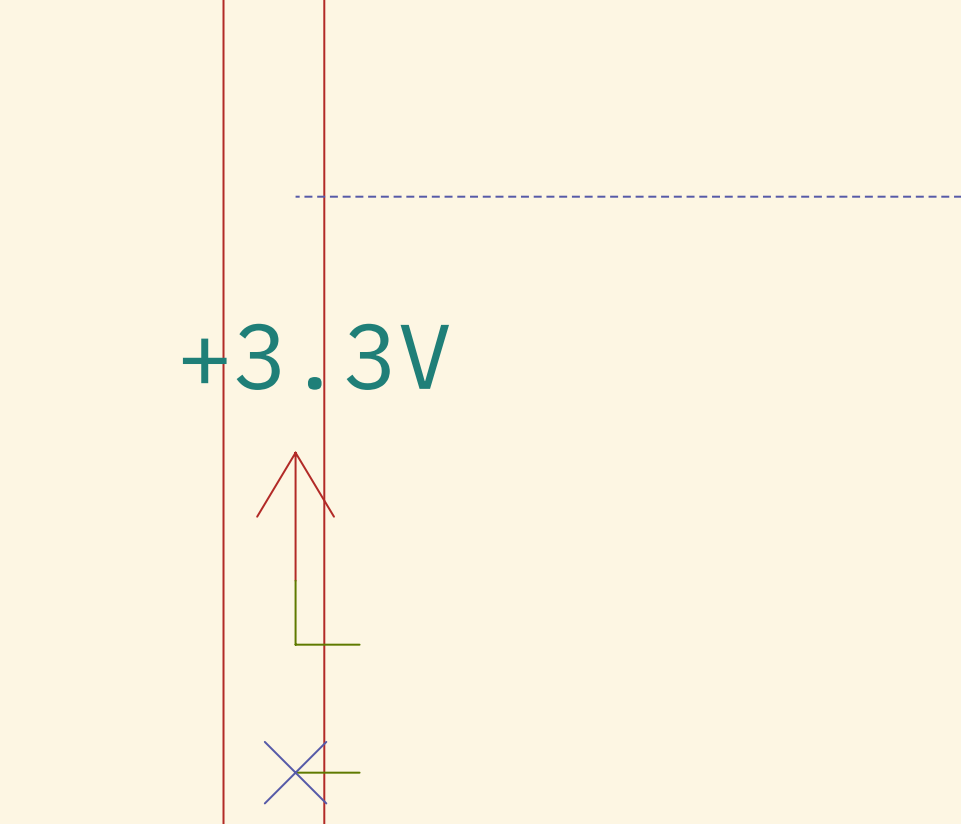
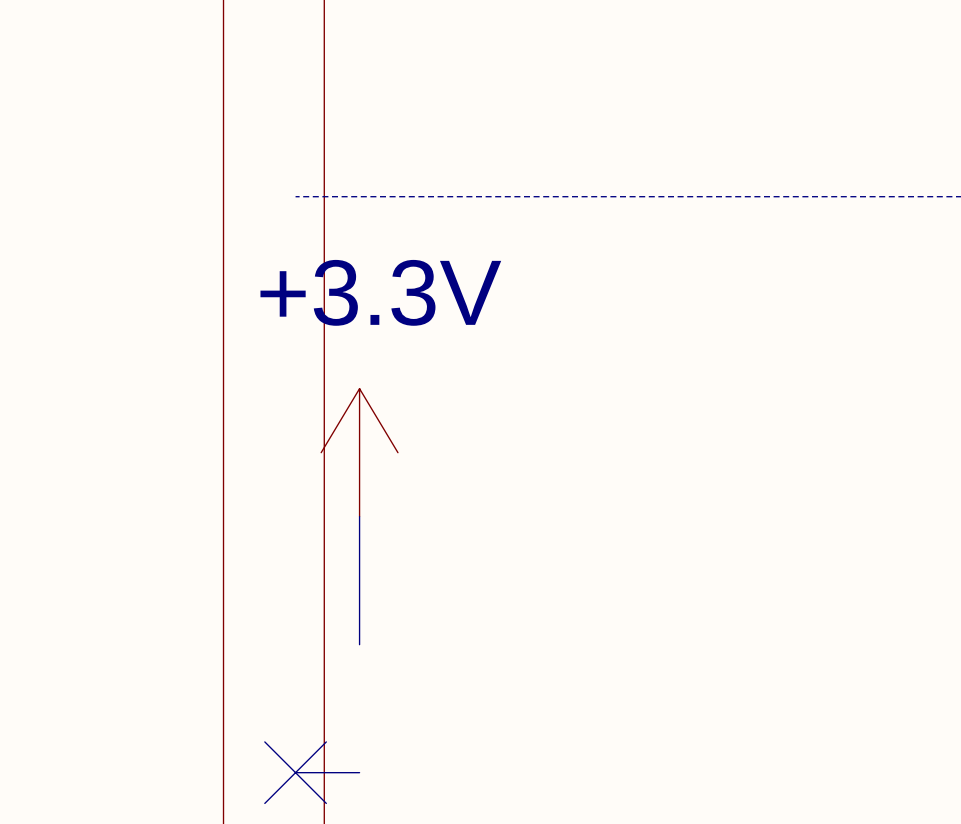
power symbol position: +3.3V (295, 516) -> +3.3V (359, 452)
wire: (295, 580) (295, 644) (359, 644) -> (359, 516) (359, 644)

